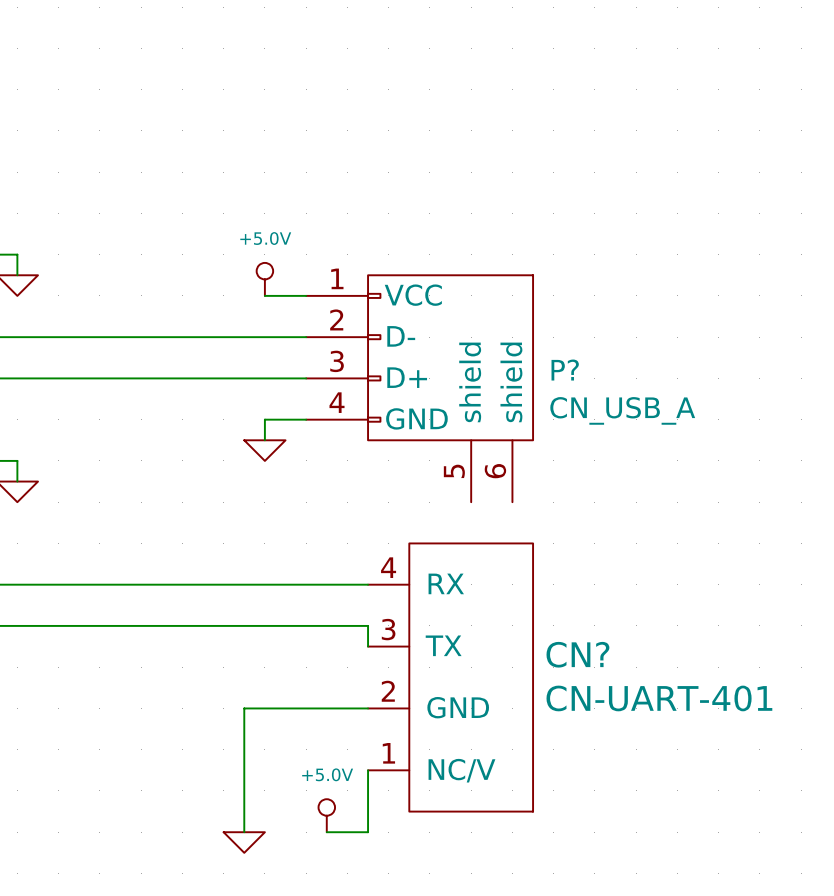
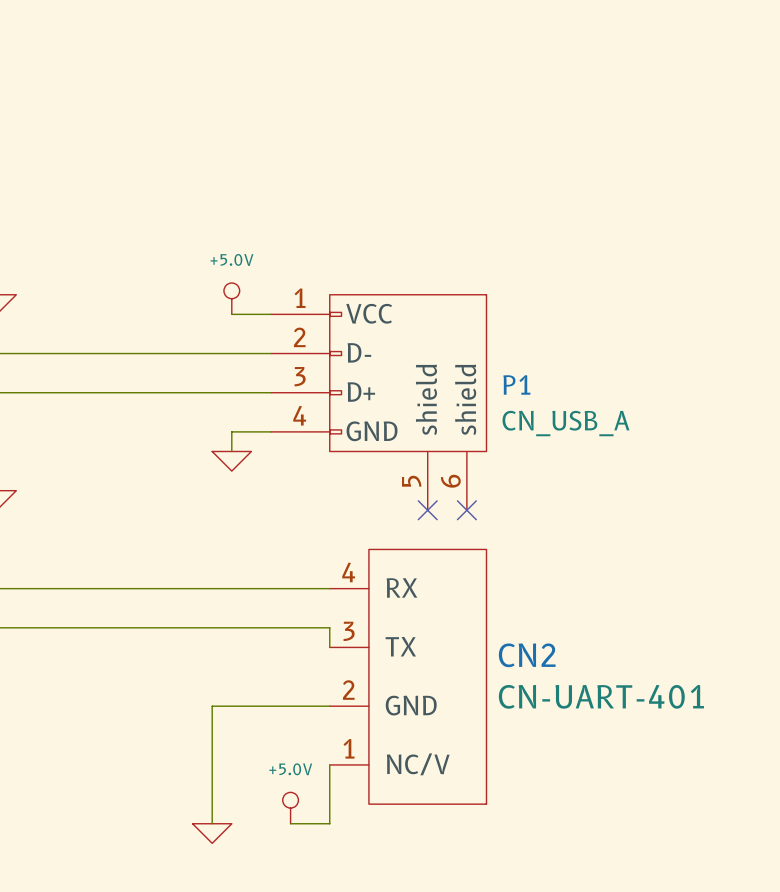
P? name: P? (565, 370) -> P1 (516, 384)
no-connect mark: none -> (427, 510)
no-connect mark: none -> (466, 510)
CN? name: CN? (577, 654) -> CN2 (527, 655)

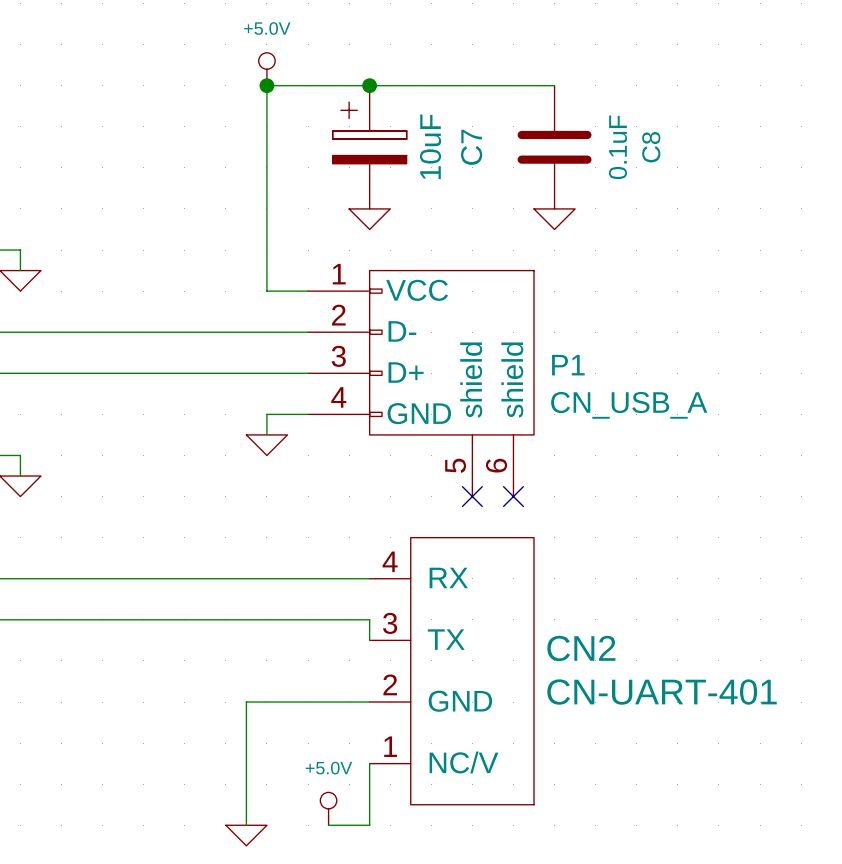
junction: none -> (266, 85)
junction: none -> (369, 85)
wire: none -> (554, 85) (266, 85) (266, 291)
C7: none -> 10uF (369, 147)
C8: none -> 0.1uF (554, 147)
power symbol: none -> (369, 219)
power symbol: none -> (554, 219)
power symbol position: +5.0V (231, 298) -> +5.0V (266, 69)

